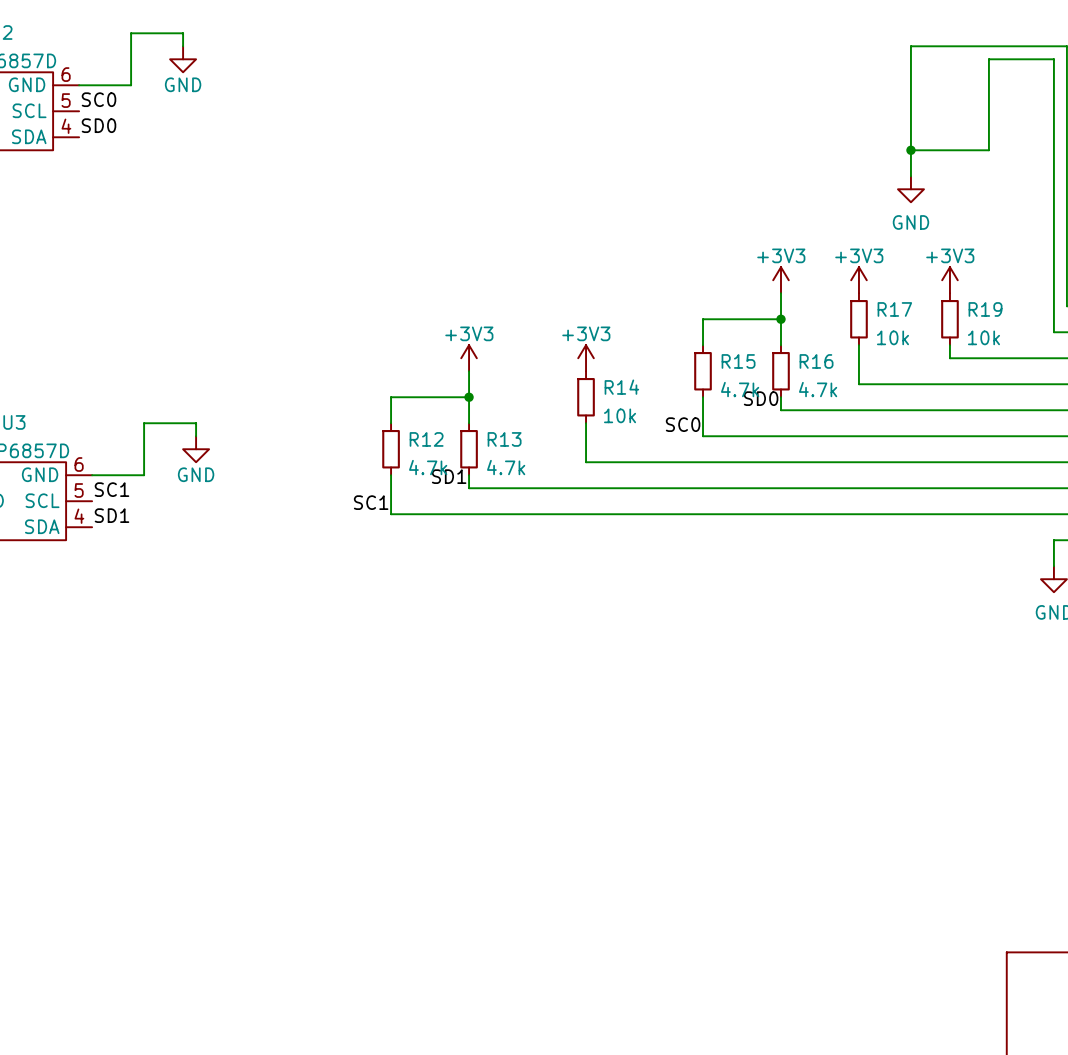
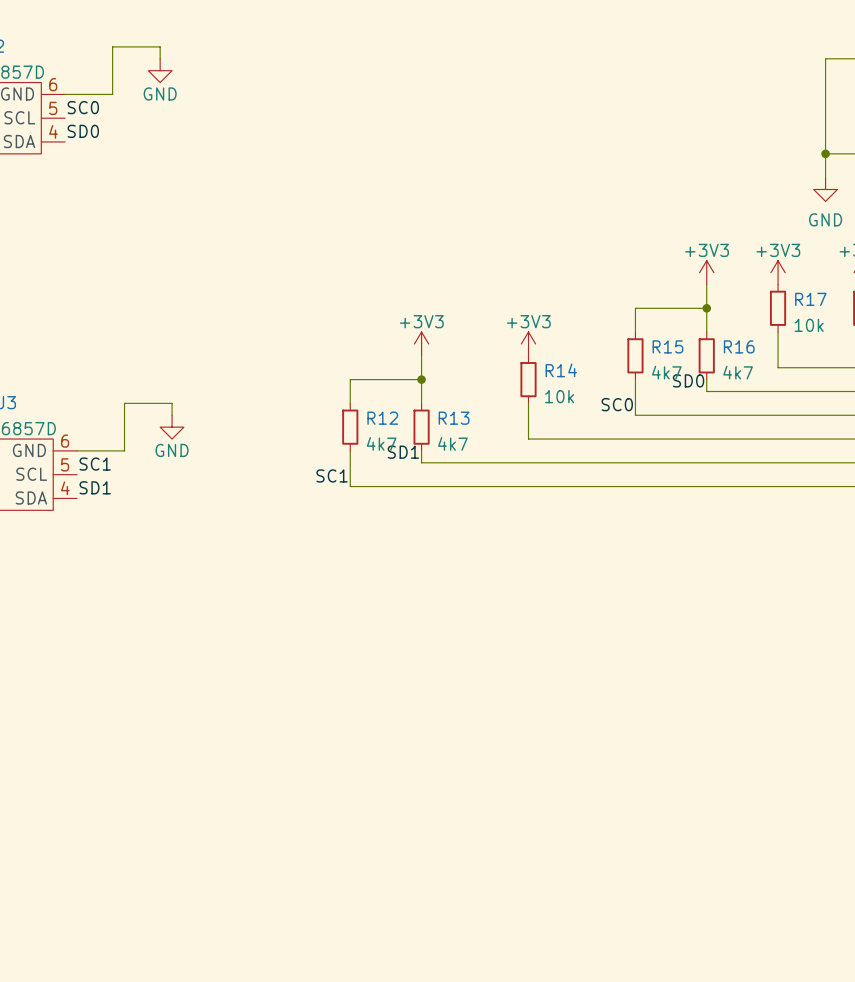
R15 value: 4.7k (740, 389) -> 4k7 (666, 372)
R16 value: 4.7k (818, 389) -> 4k7 (738, 372)
R12 value: 4.7k (428, 467) -> 4k7 (381, 443)
R13 value: 4.7k (506, 467) -> 4k7 (452, 443)

